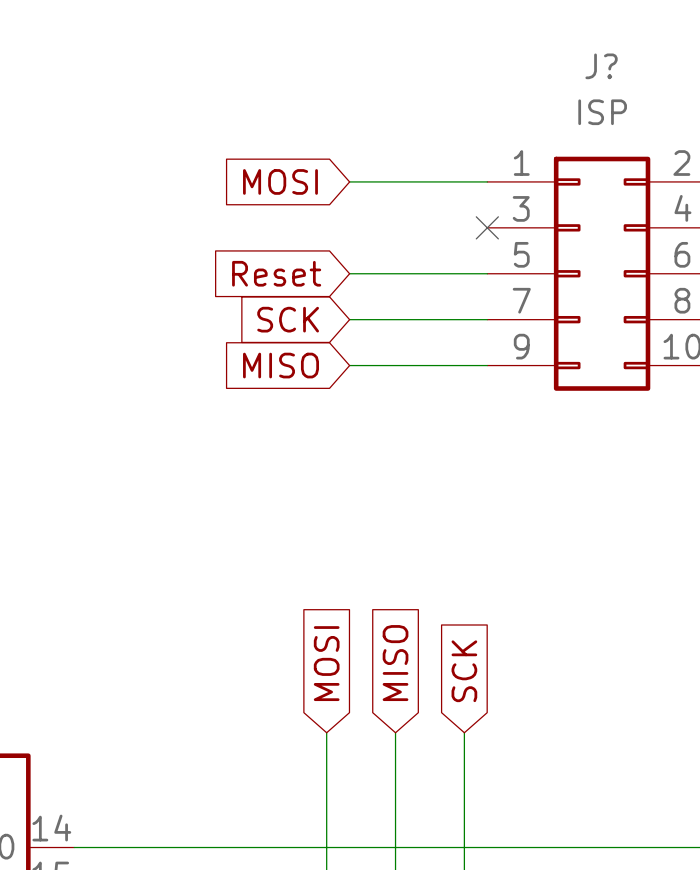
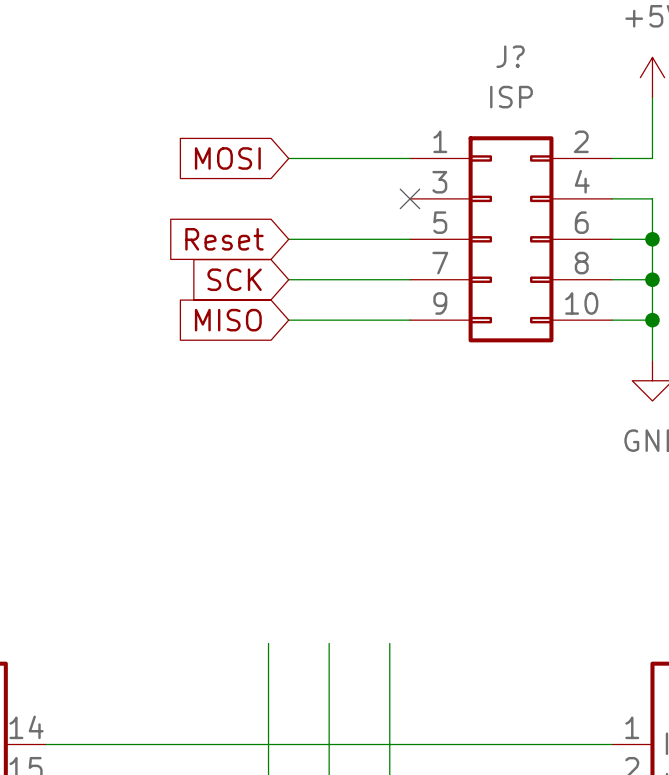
global label: MOSI (326, 663) -> none
global label: MISO (395, 663) -> none
global label: SCK (464, 671) -> none

